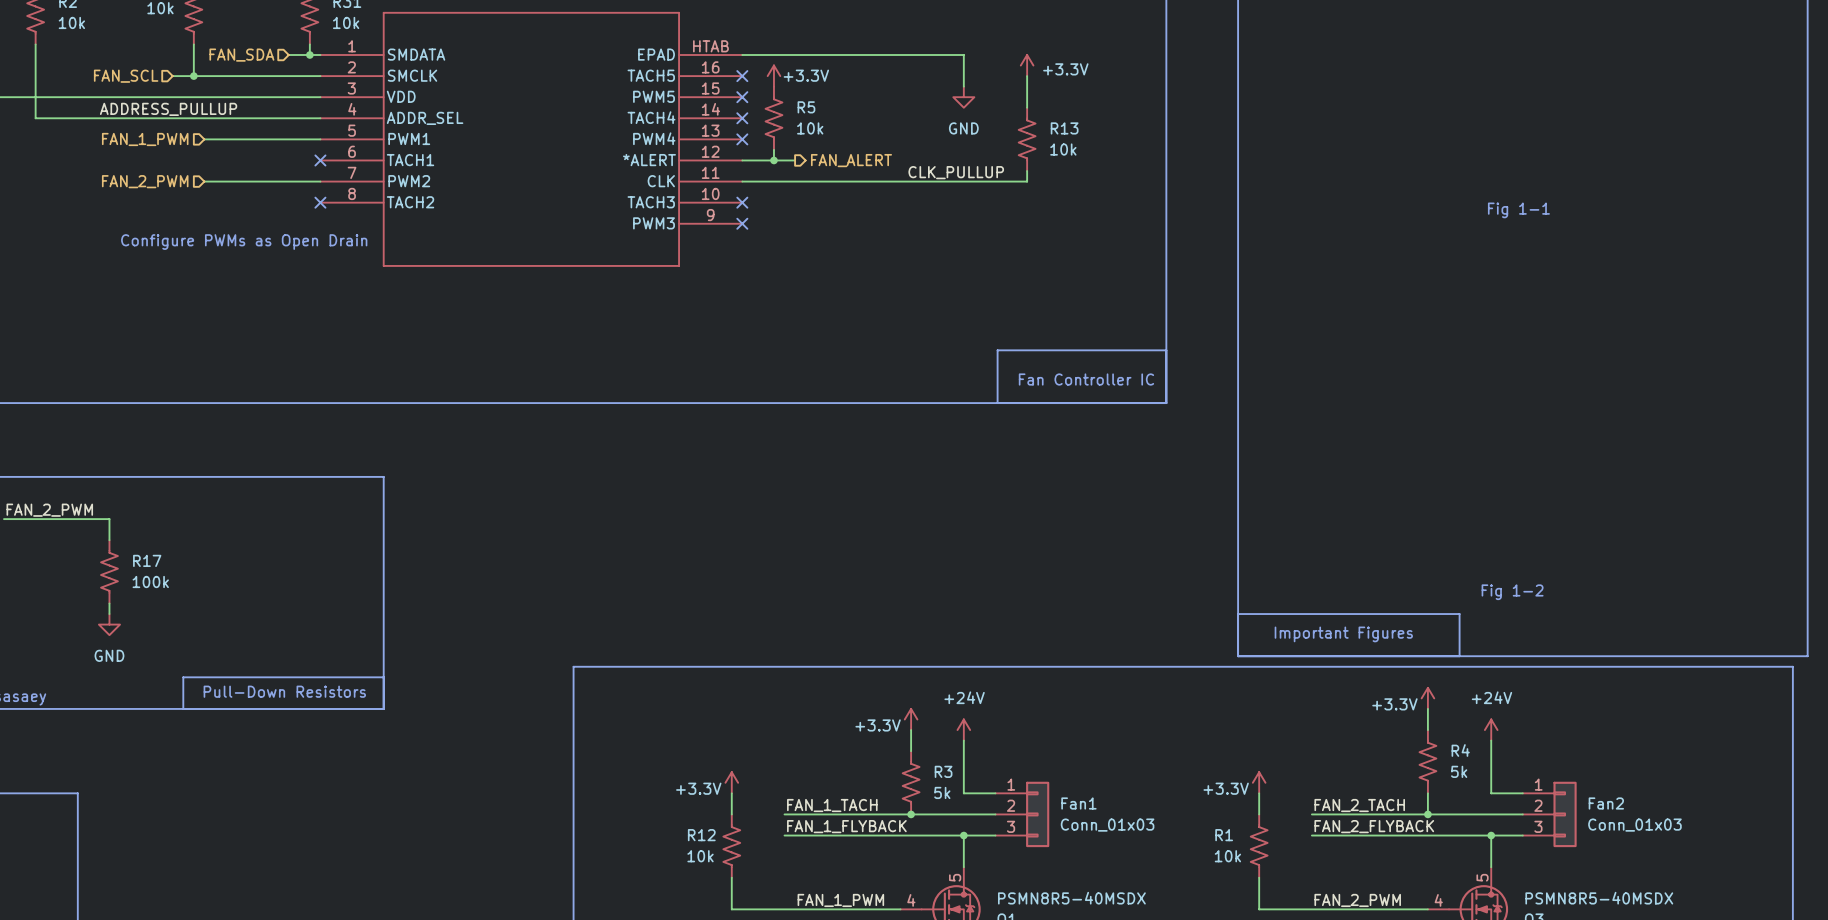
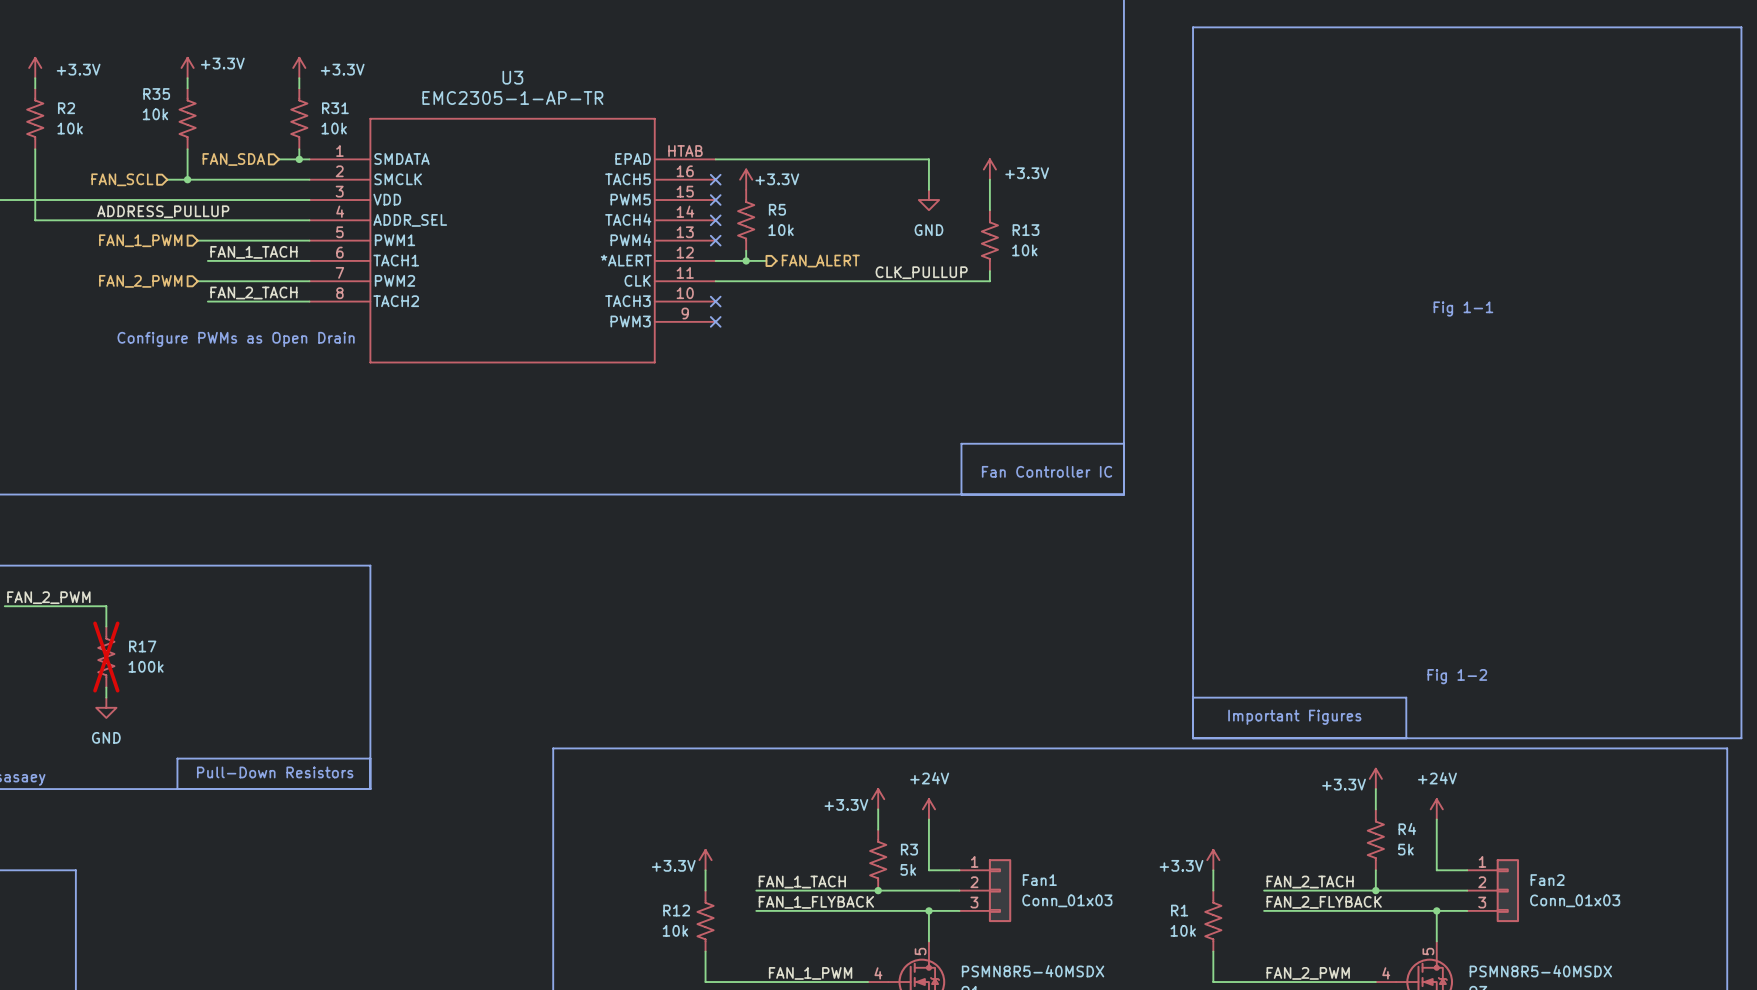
label: none -> FAN_1_TACH (253, 252)
wire: none -> (207, 260) (309, 260)
no-connect mark: (320, 160) -> none
label: none -> FAN_2_TACH (253, 292)
wire: none -> (207, 301) (309, 301)
no-connect mark: (320, 202) -> none
R17 do-not-place cross: none -> (106, 657)

